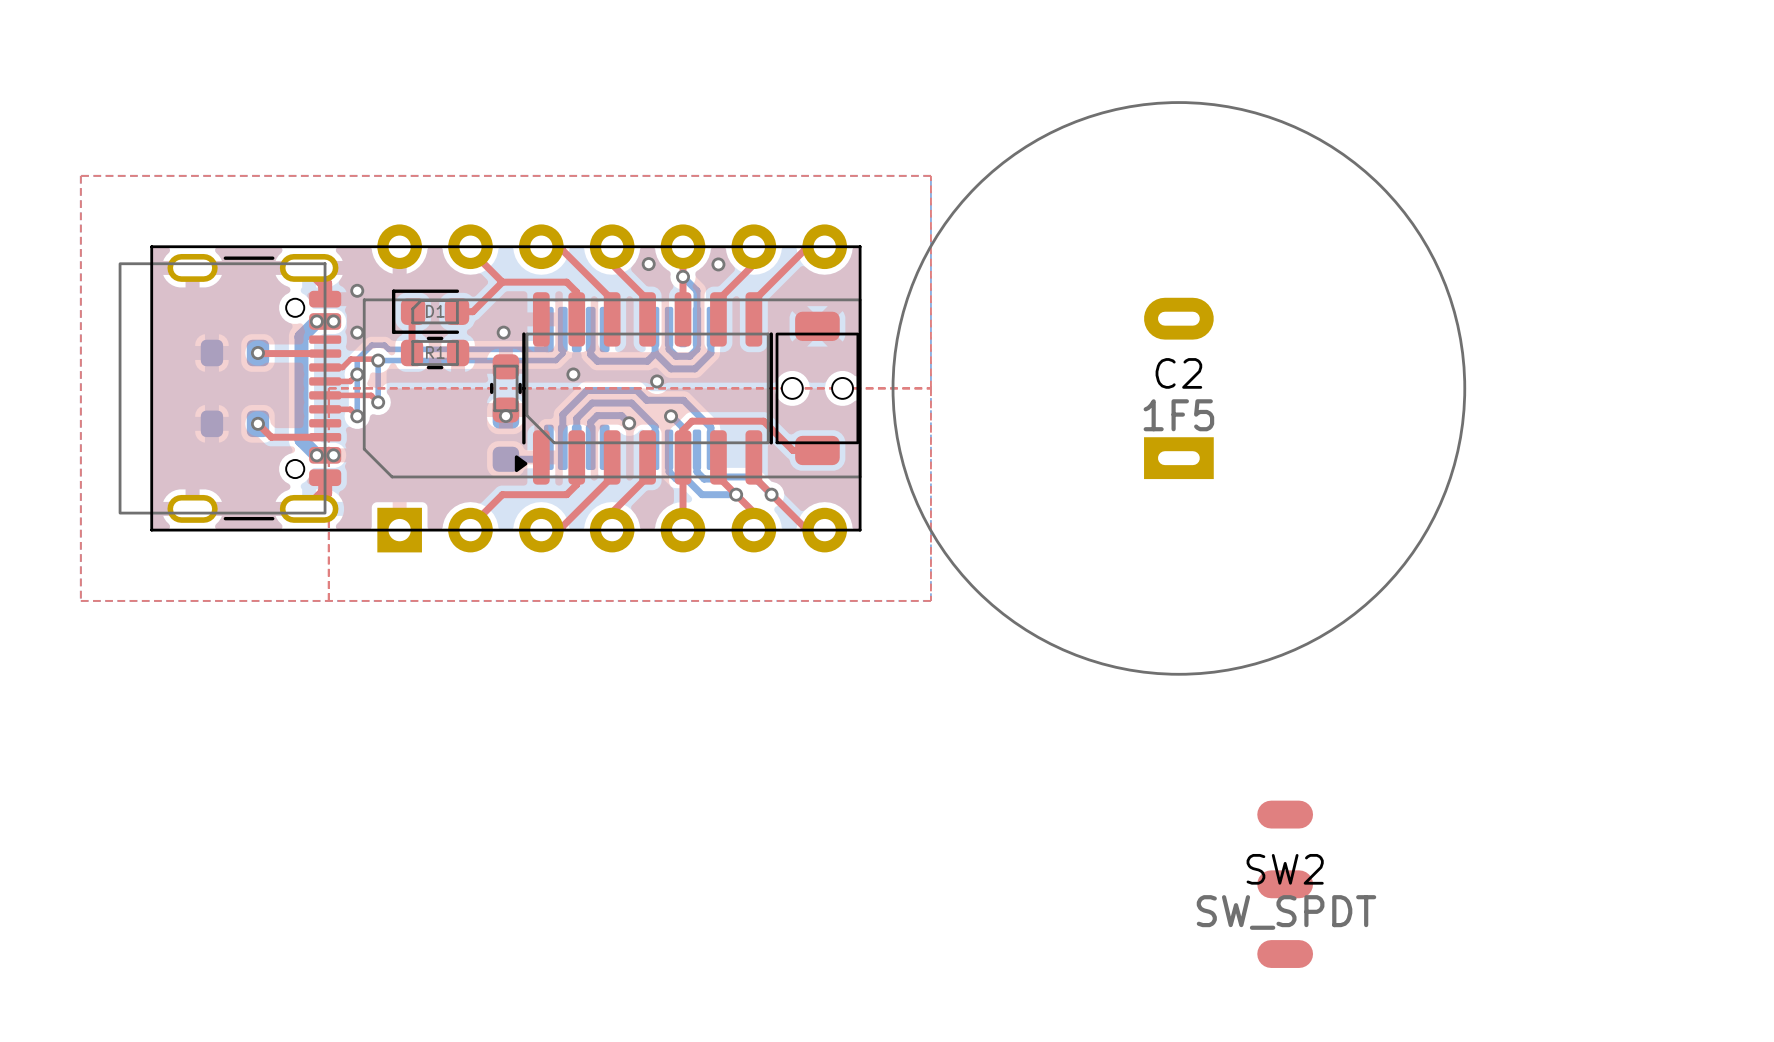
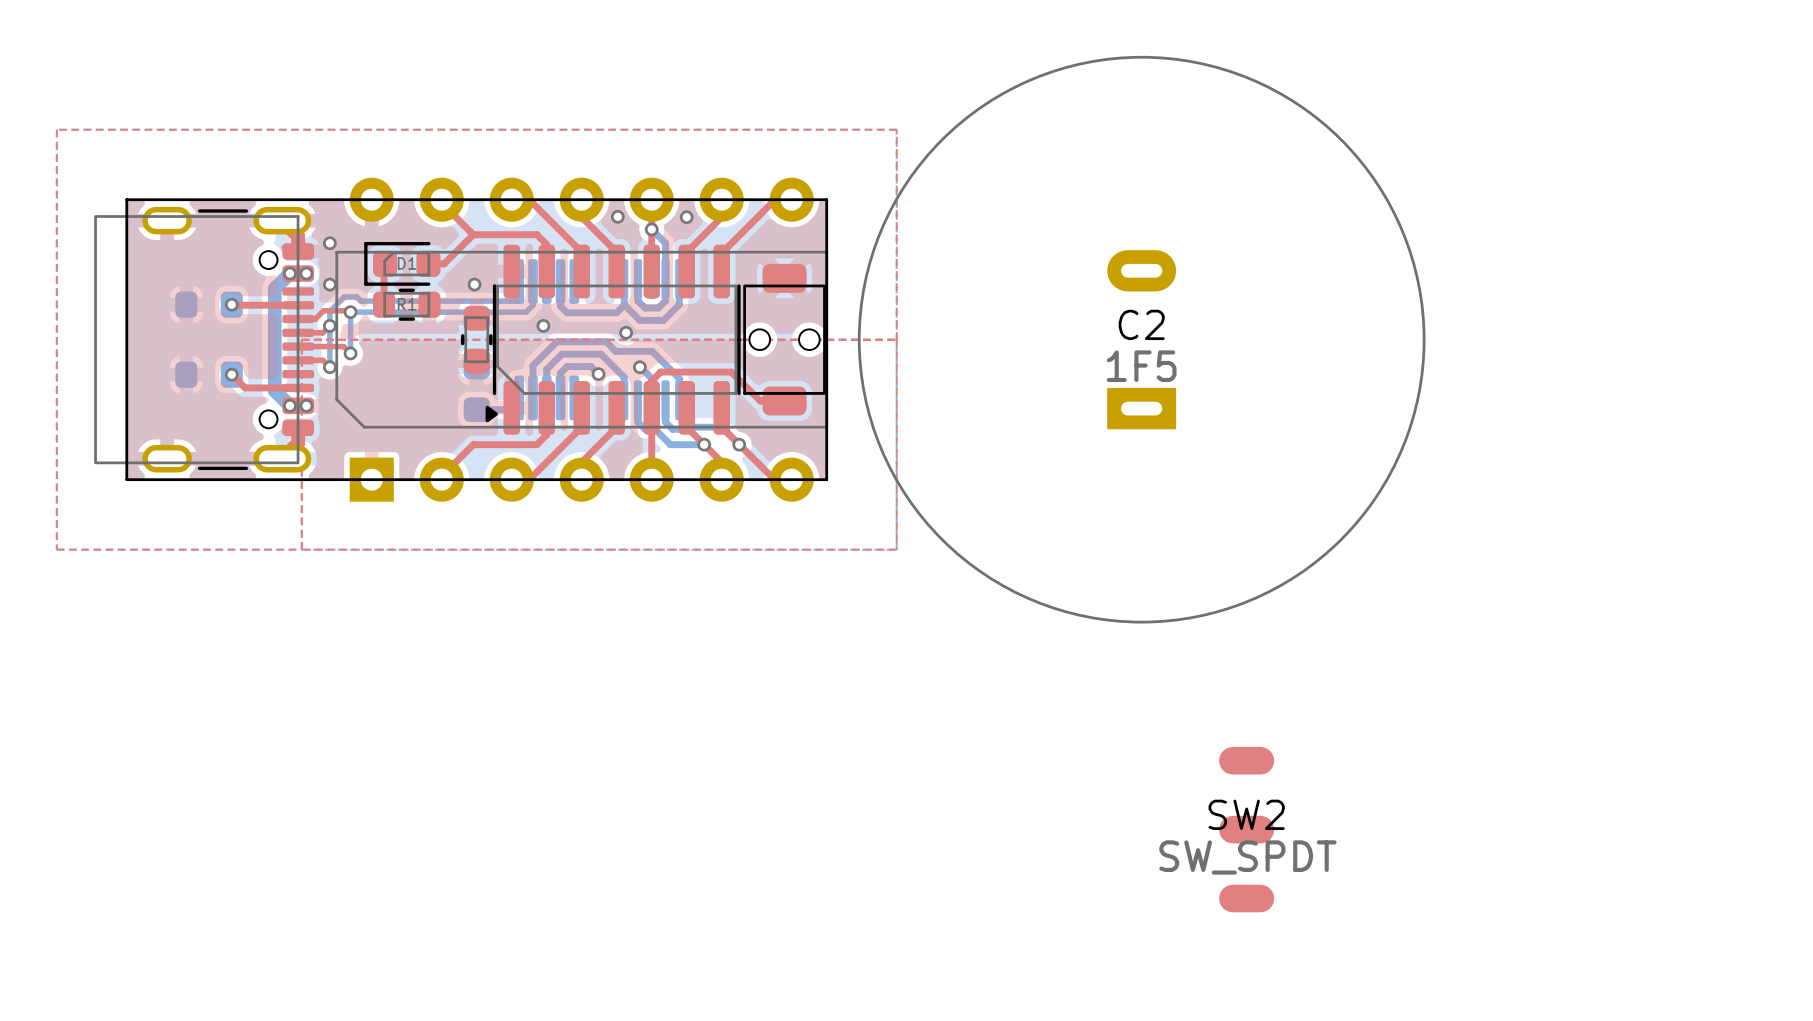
via: (505, 416) -> none

